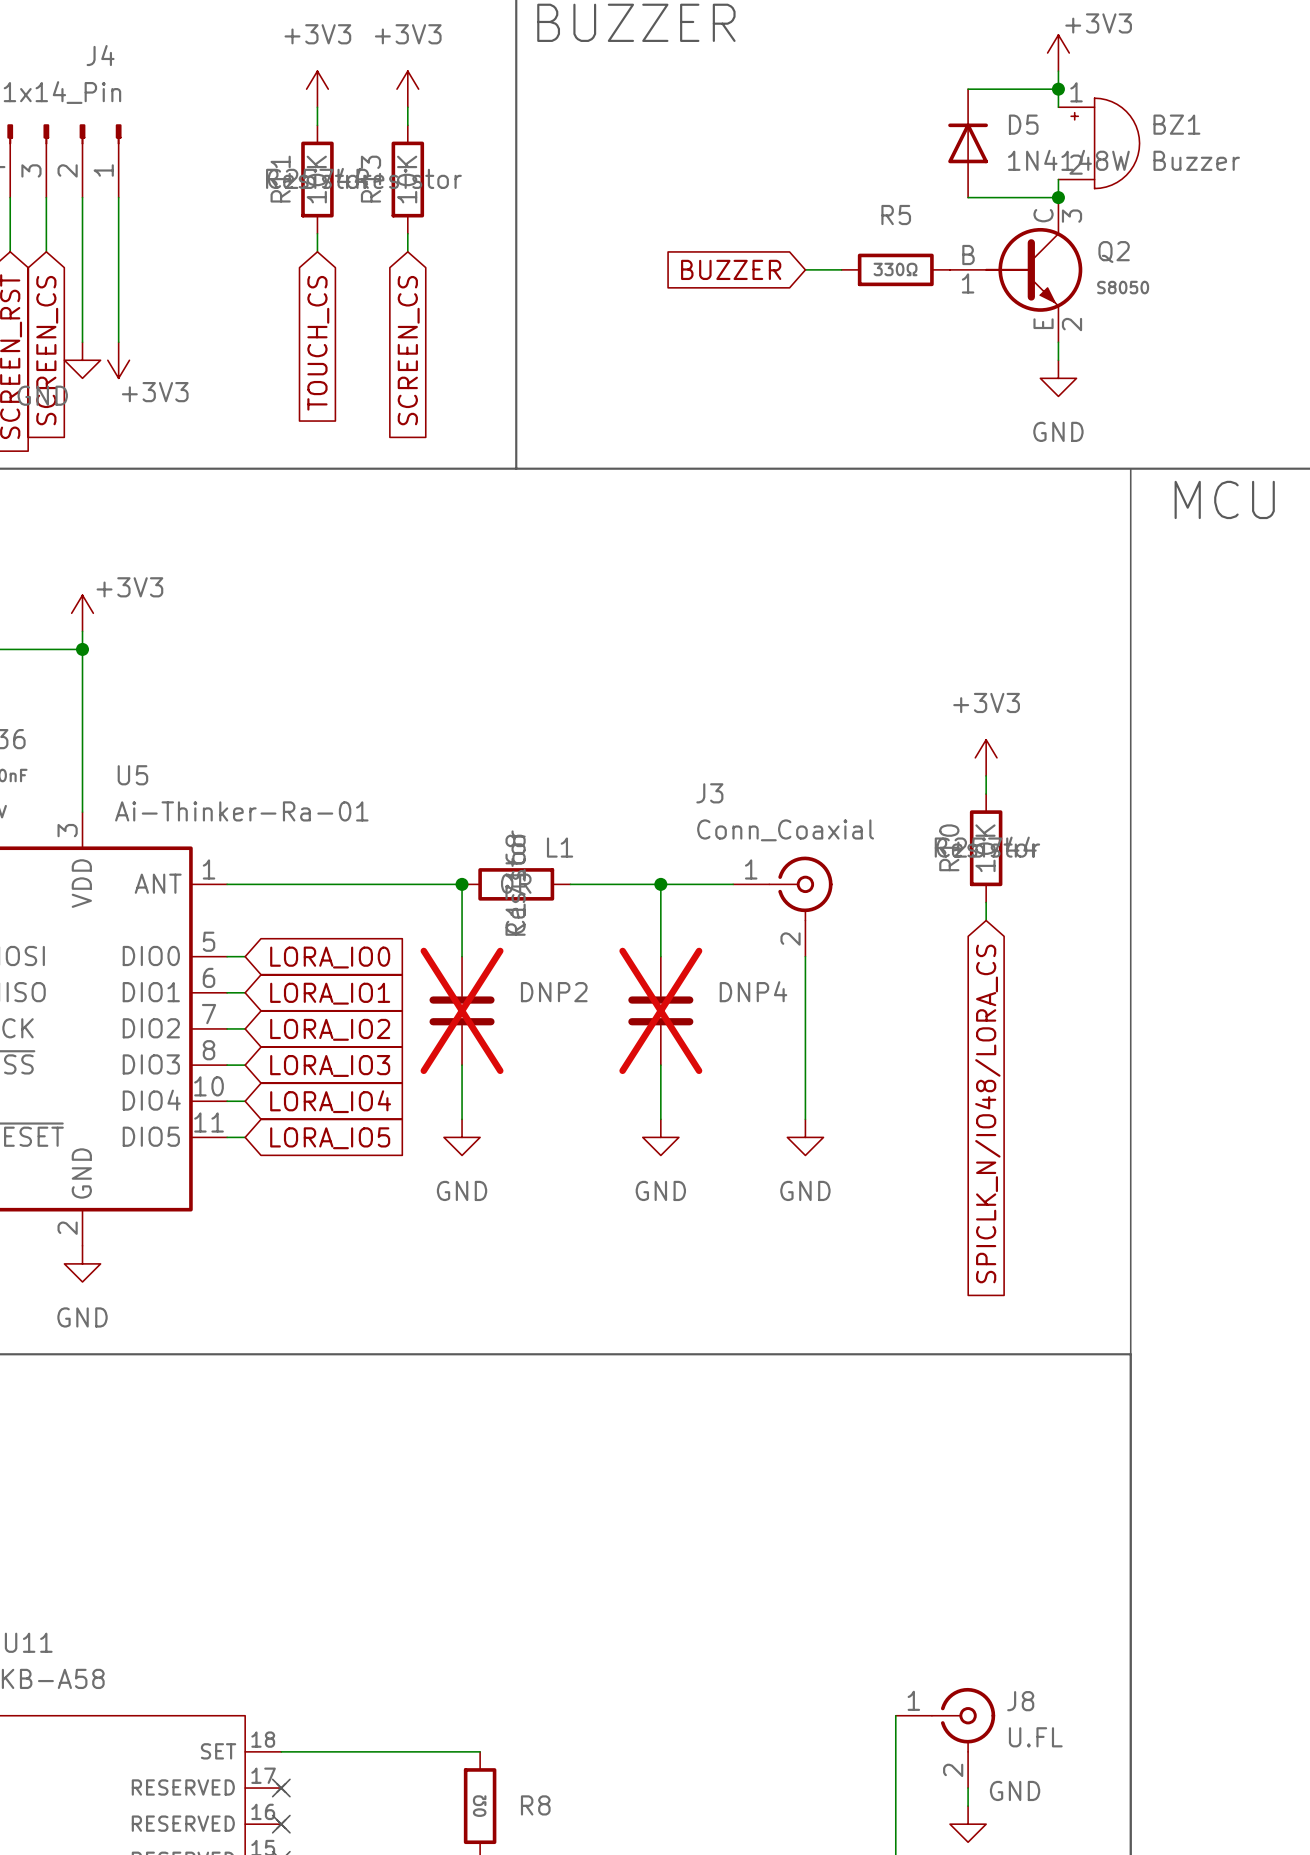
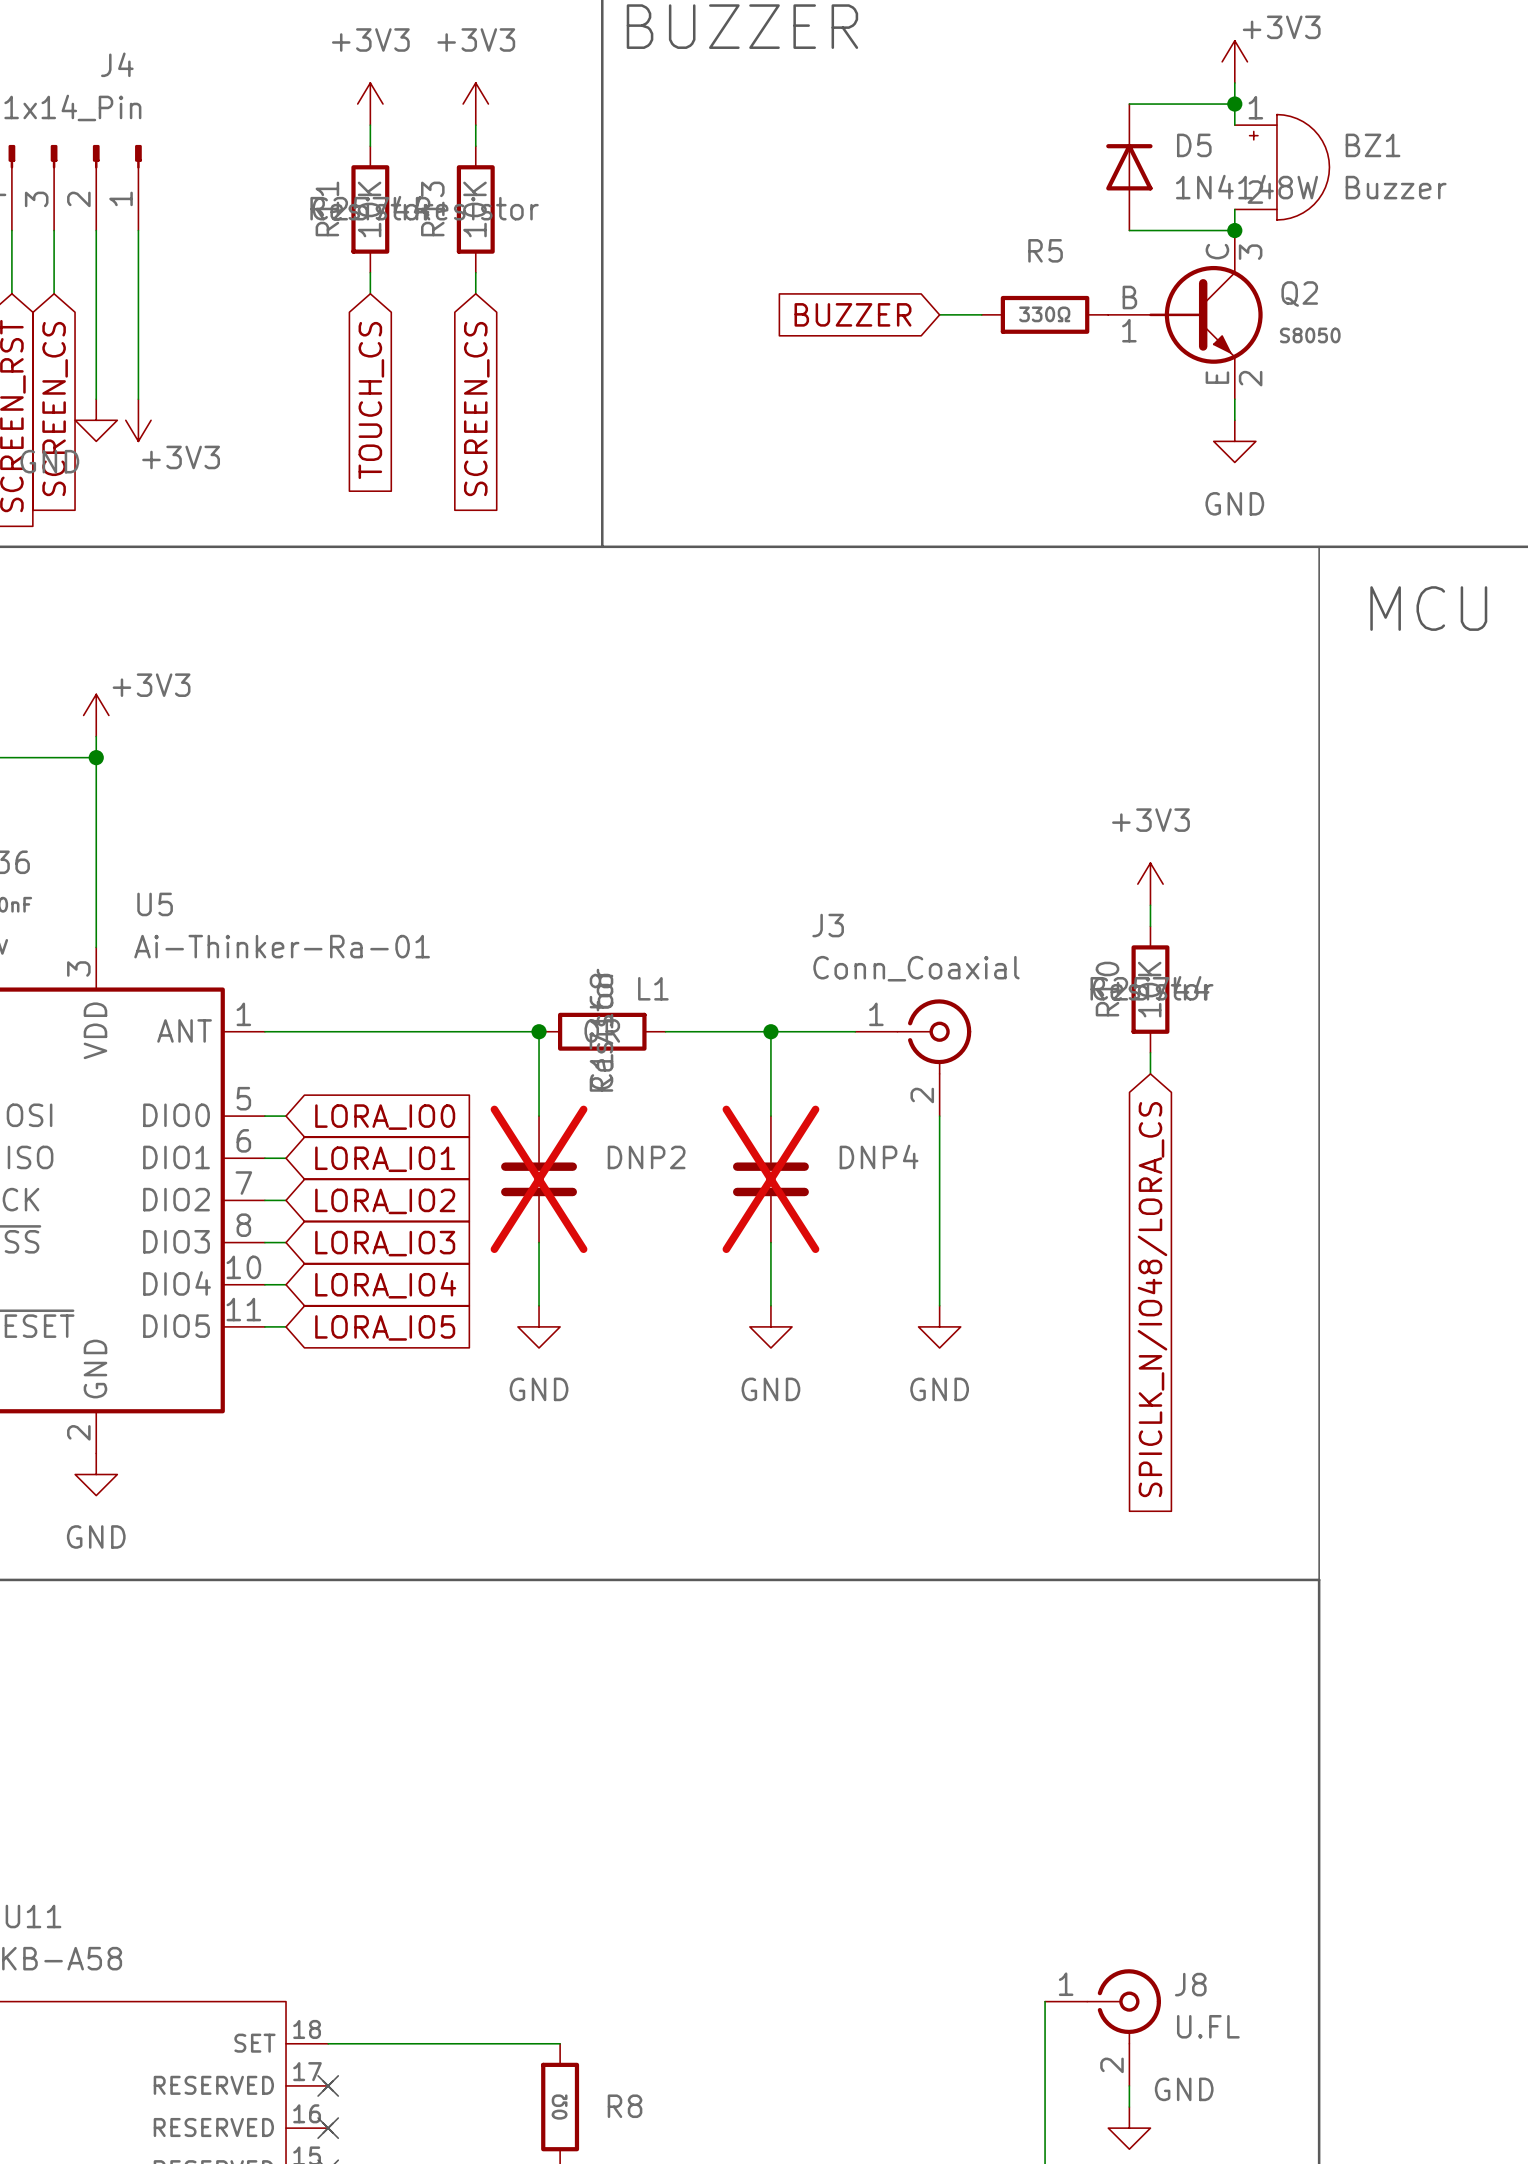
text position: MCU (1224, 499) -> MCU (1428, 608)

